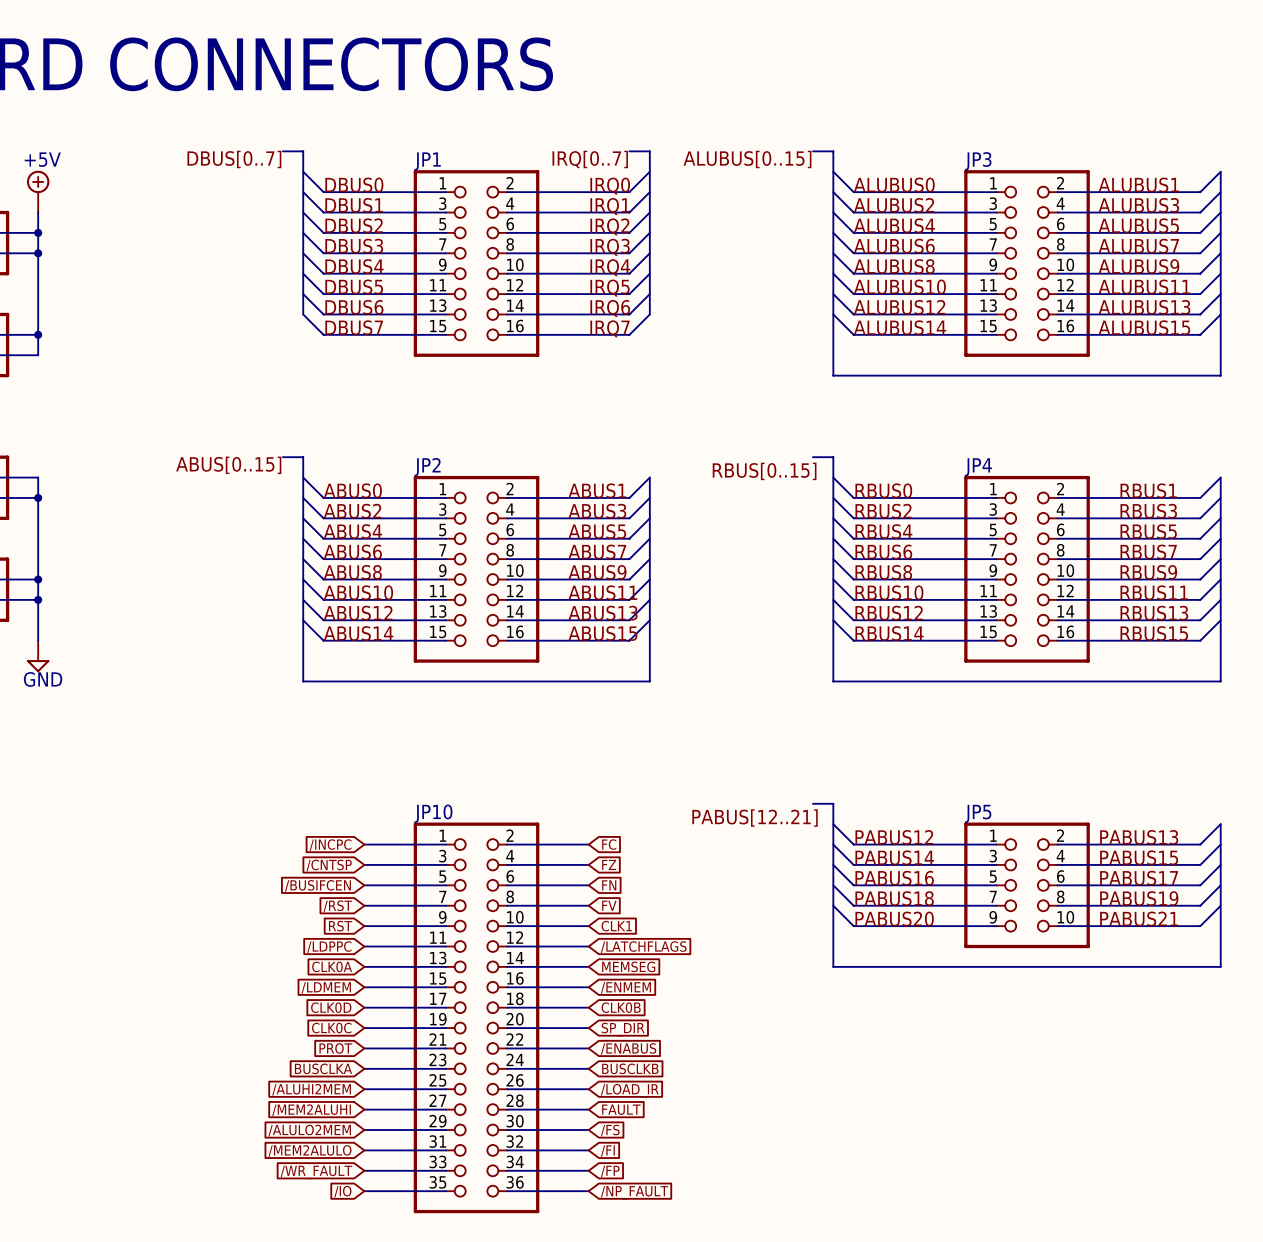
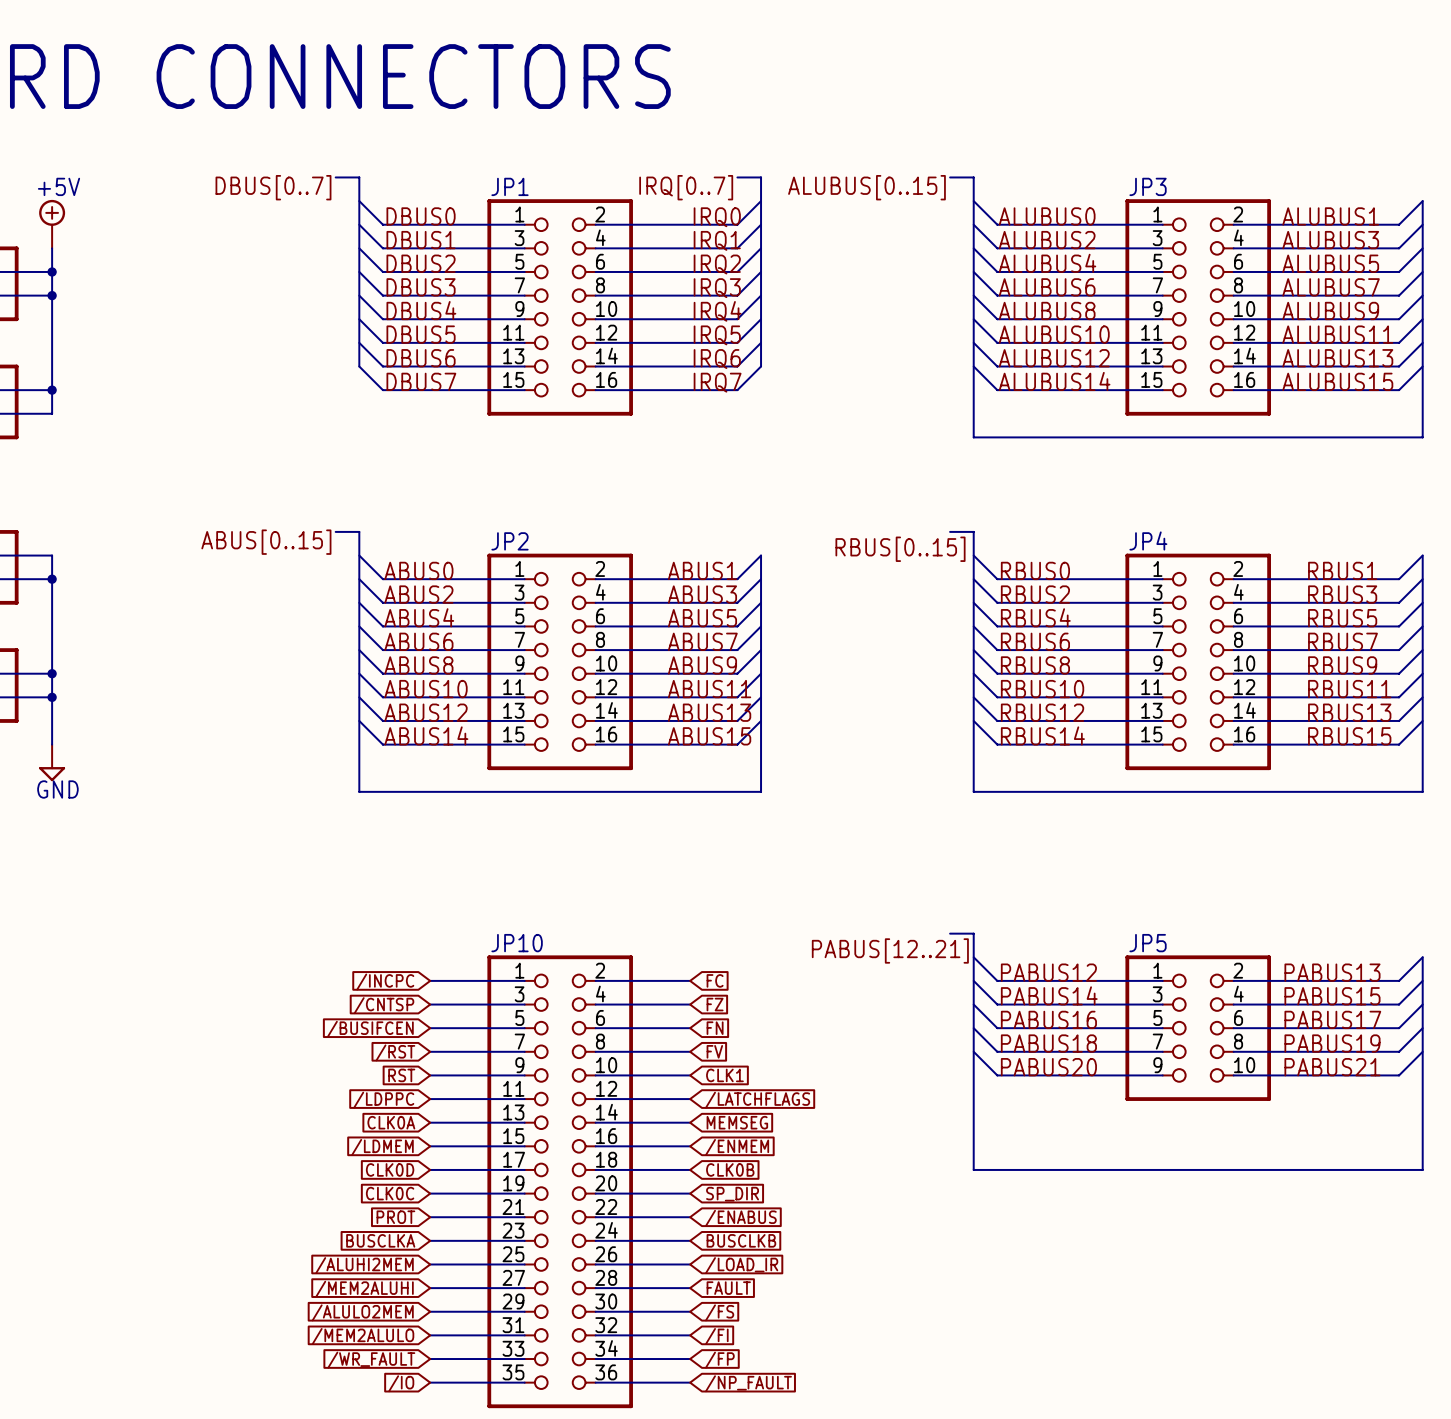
bus: (833, 966) (1220, 966) -> (973, 1122) (973, 1169) (1422, 1169) (1422, 1122)

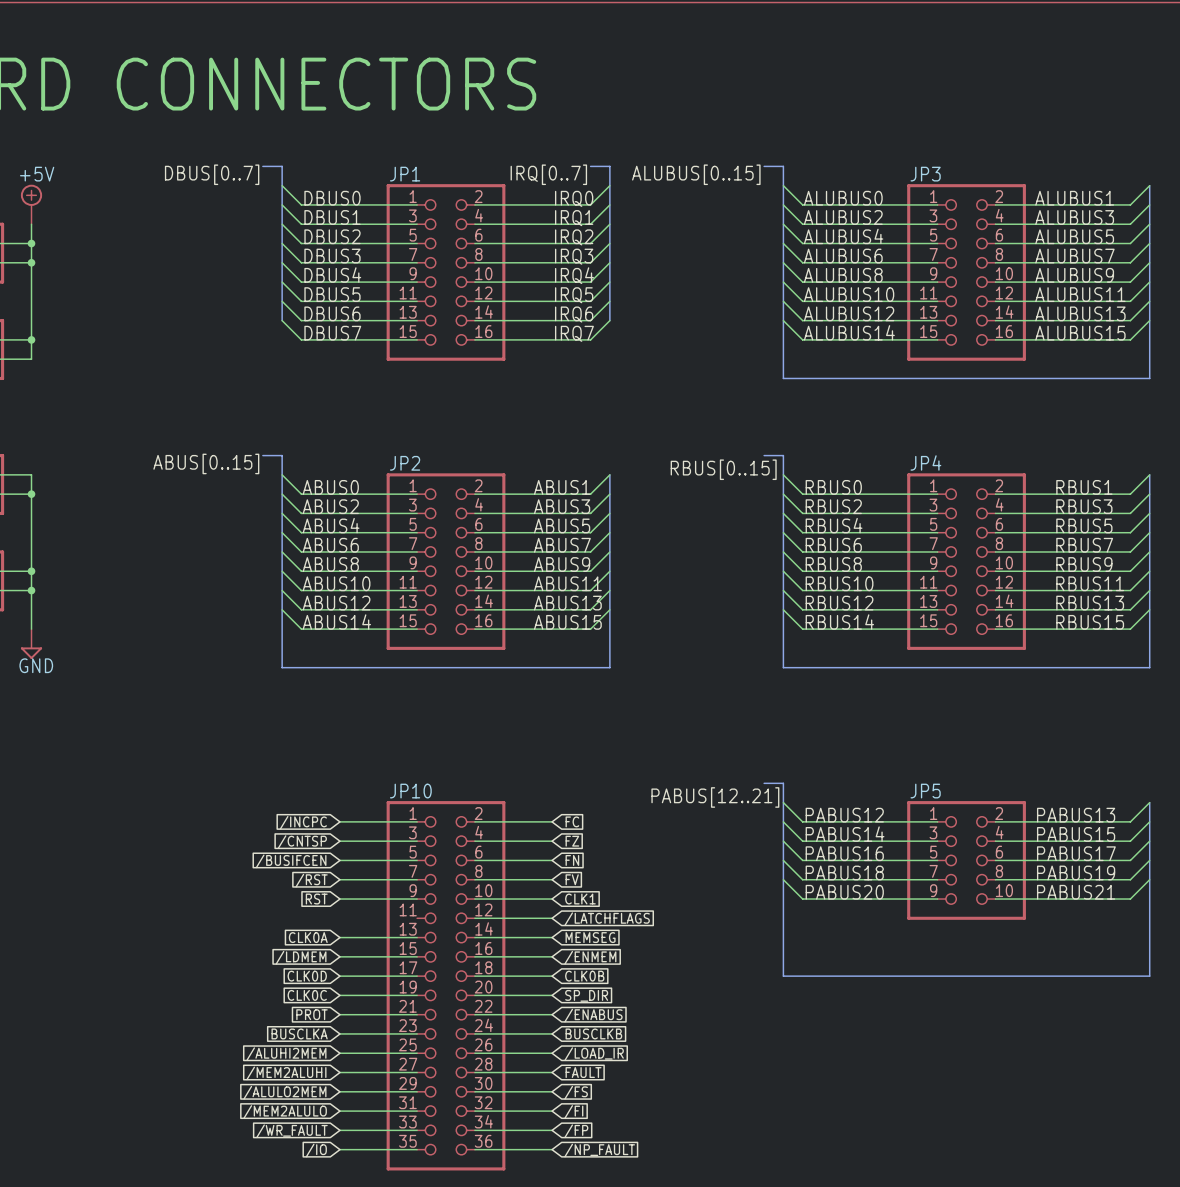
wire: (430, 1099) (524, 1099) -> none
global label: /LDPPC (383, 1100) -> none

